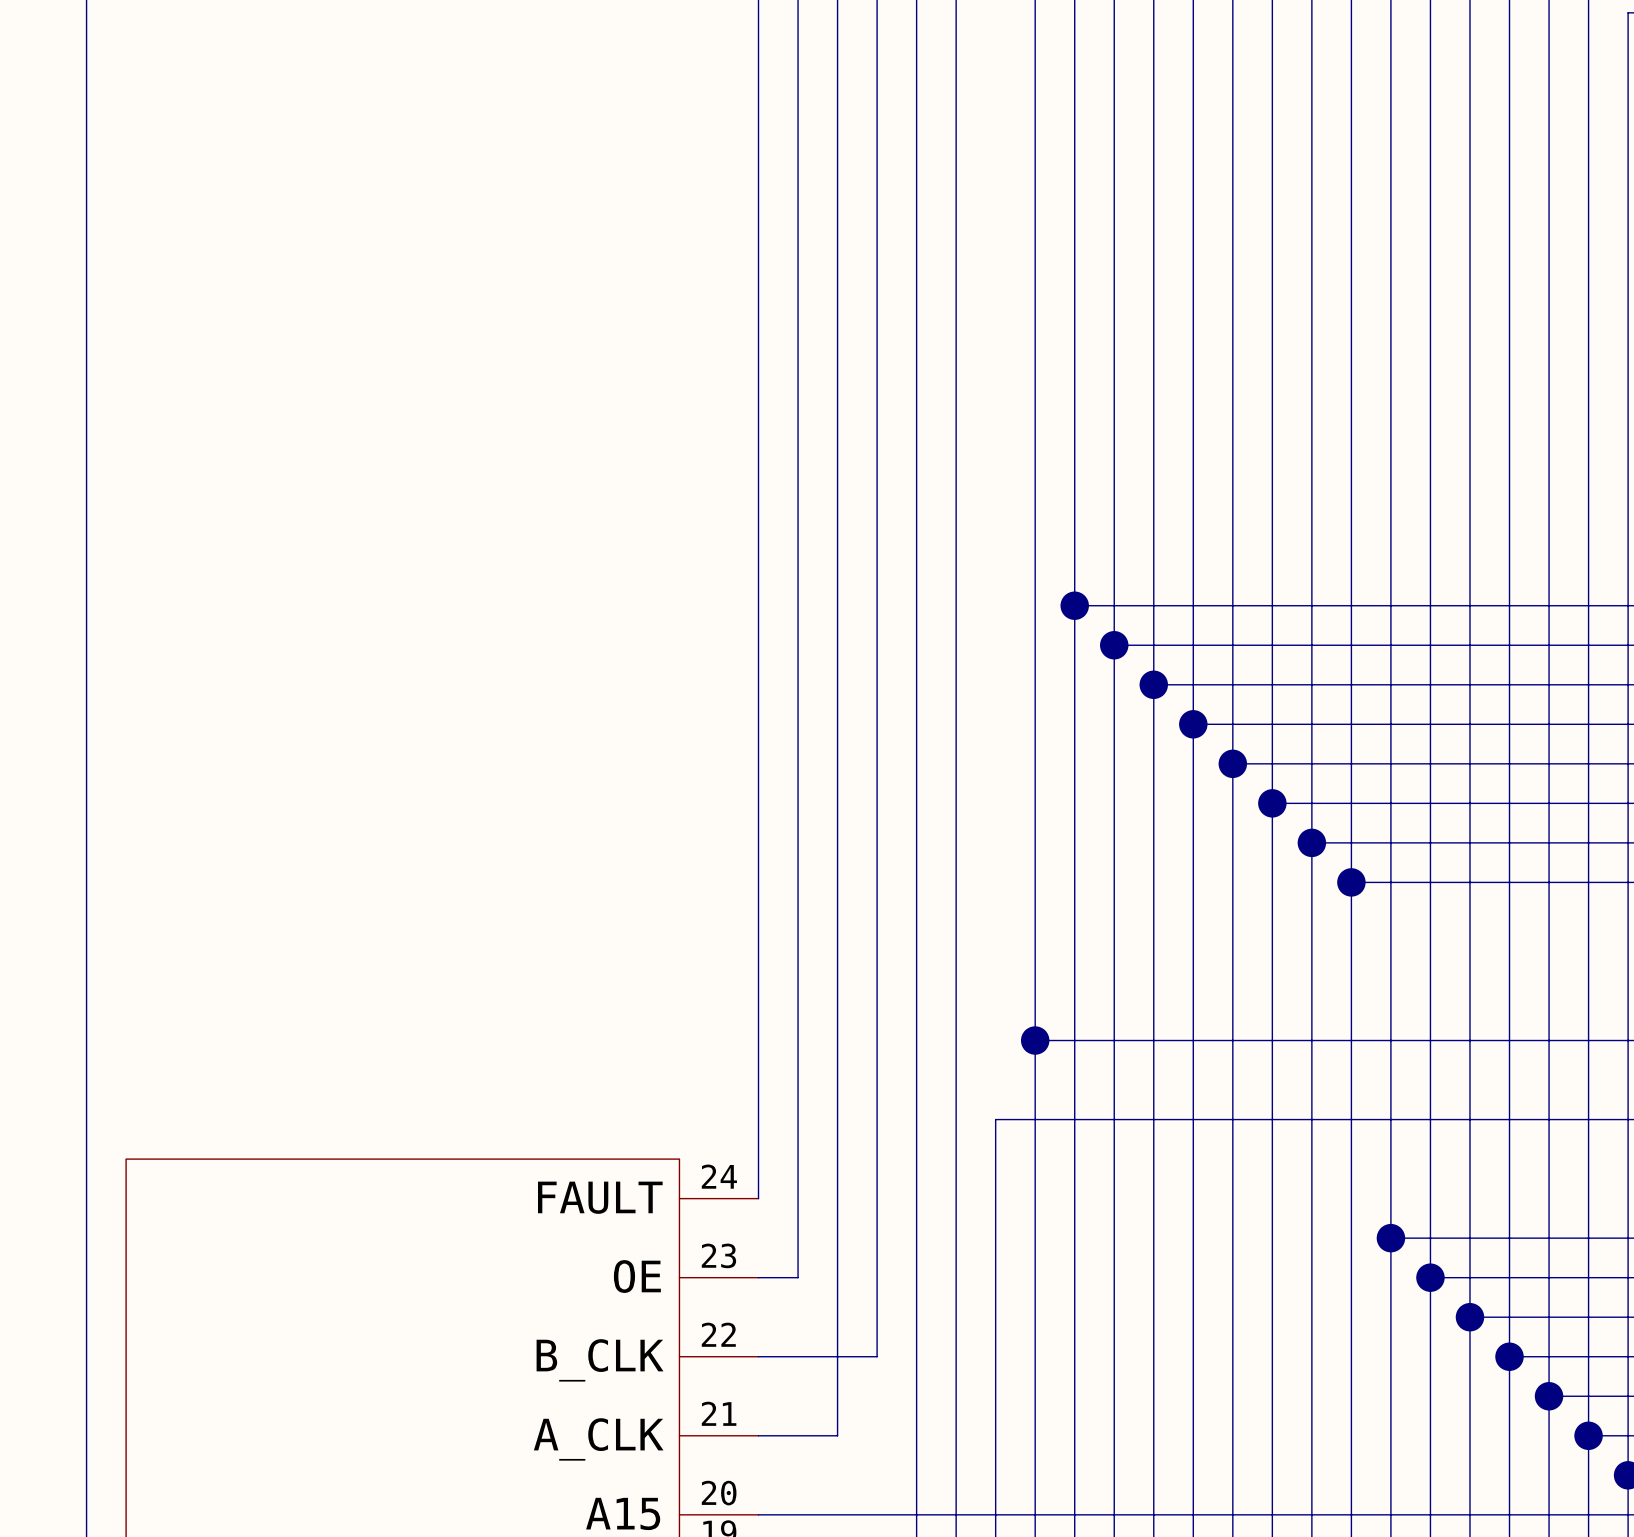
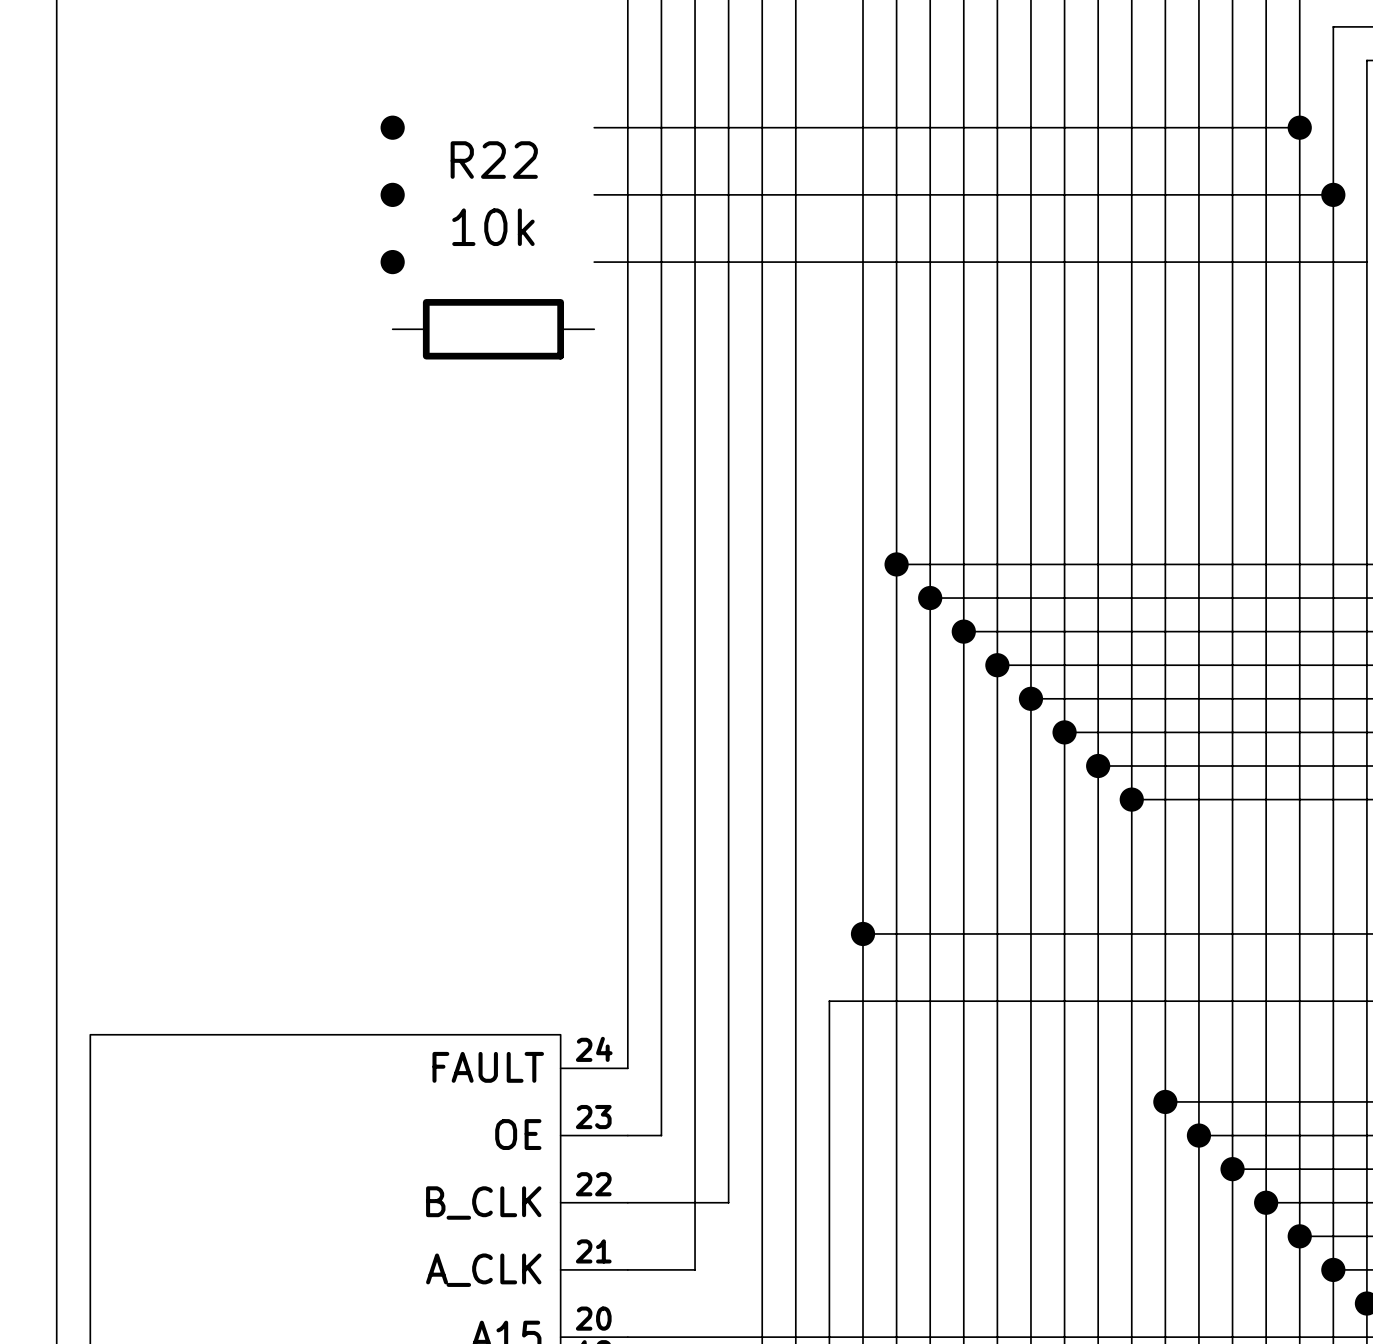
junction: none -> (392, 127)
wire: none -> (594, 127) (1299, 127)
junction: none -> (1299, 127)
junction: none -> (392, 194)
wire: none -> (594, 194) (1333, 194)
junction: none -> (1333, 194)
junction: none -> (392, 262)
wire: none -> (594, 262) (1366, 262)
R22: none -> 10k (493, 329)

